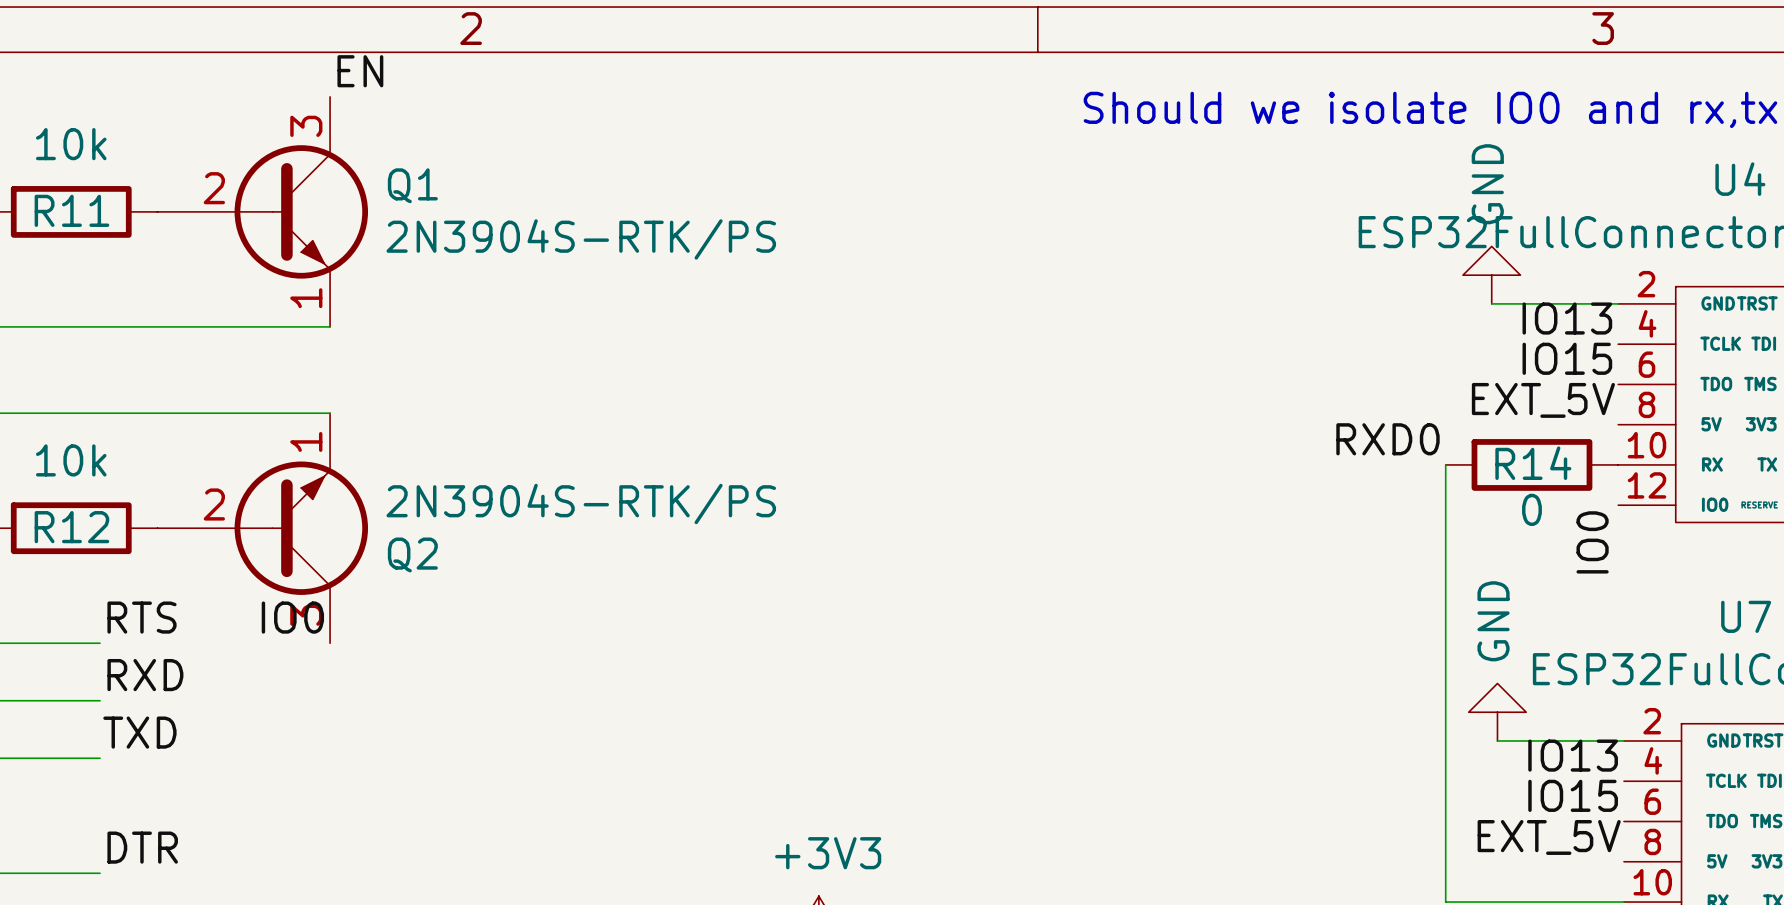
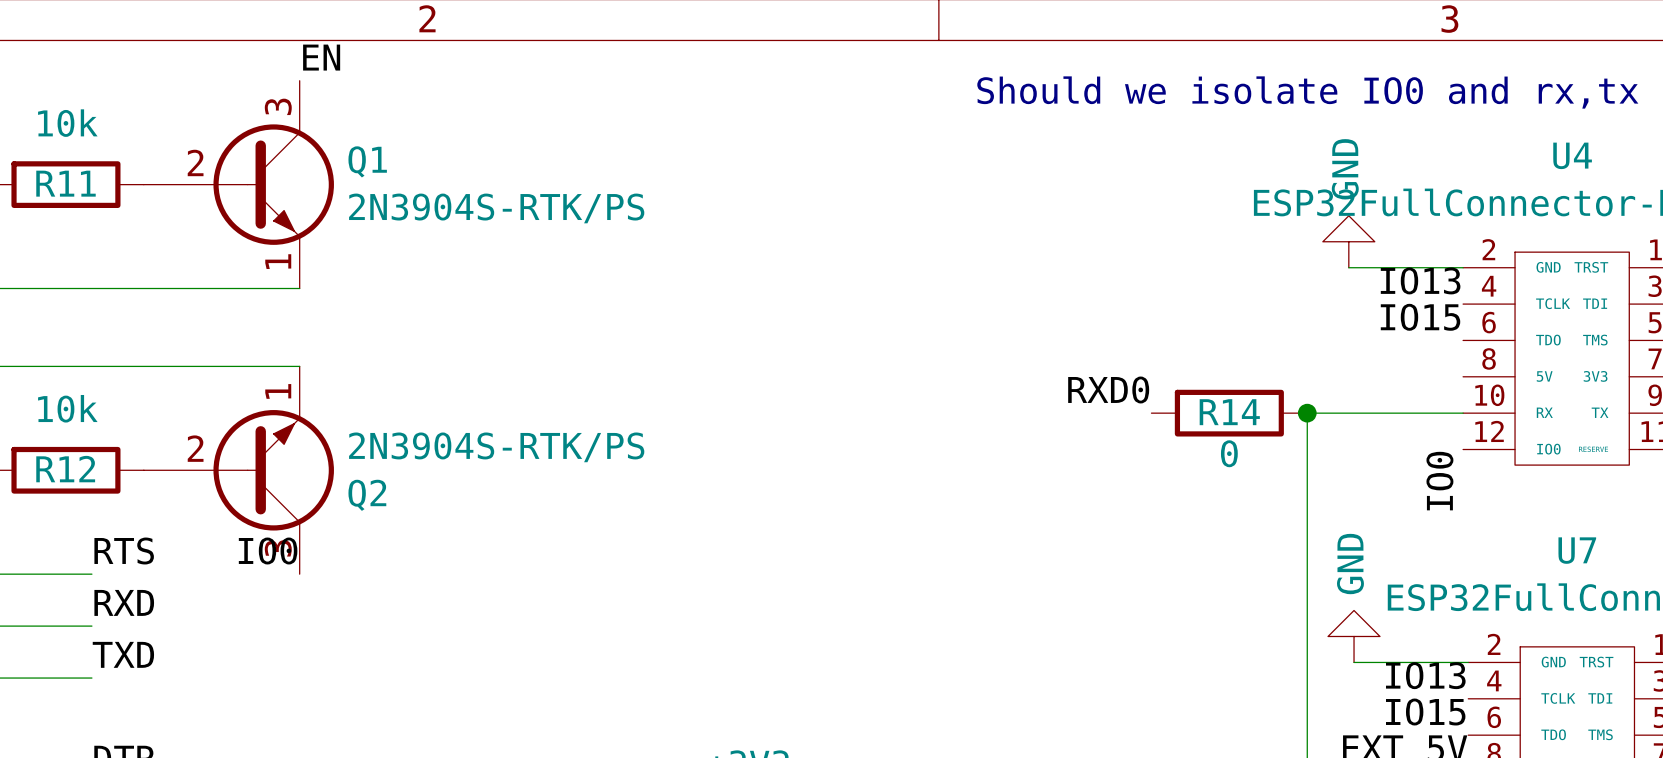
label: EXT_5V (1543, 400) -> none
label position: RXD0 (1387, 439) -> RXD0 (1108, 389)
wire: none -> (1307, 413) (1463, 413)
junction: none -> (1307, 413)
R14 position: (1531, 464) -> (1229, 413)

